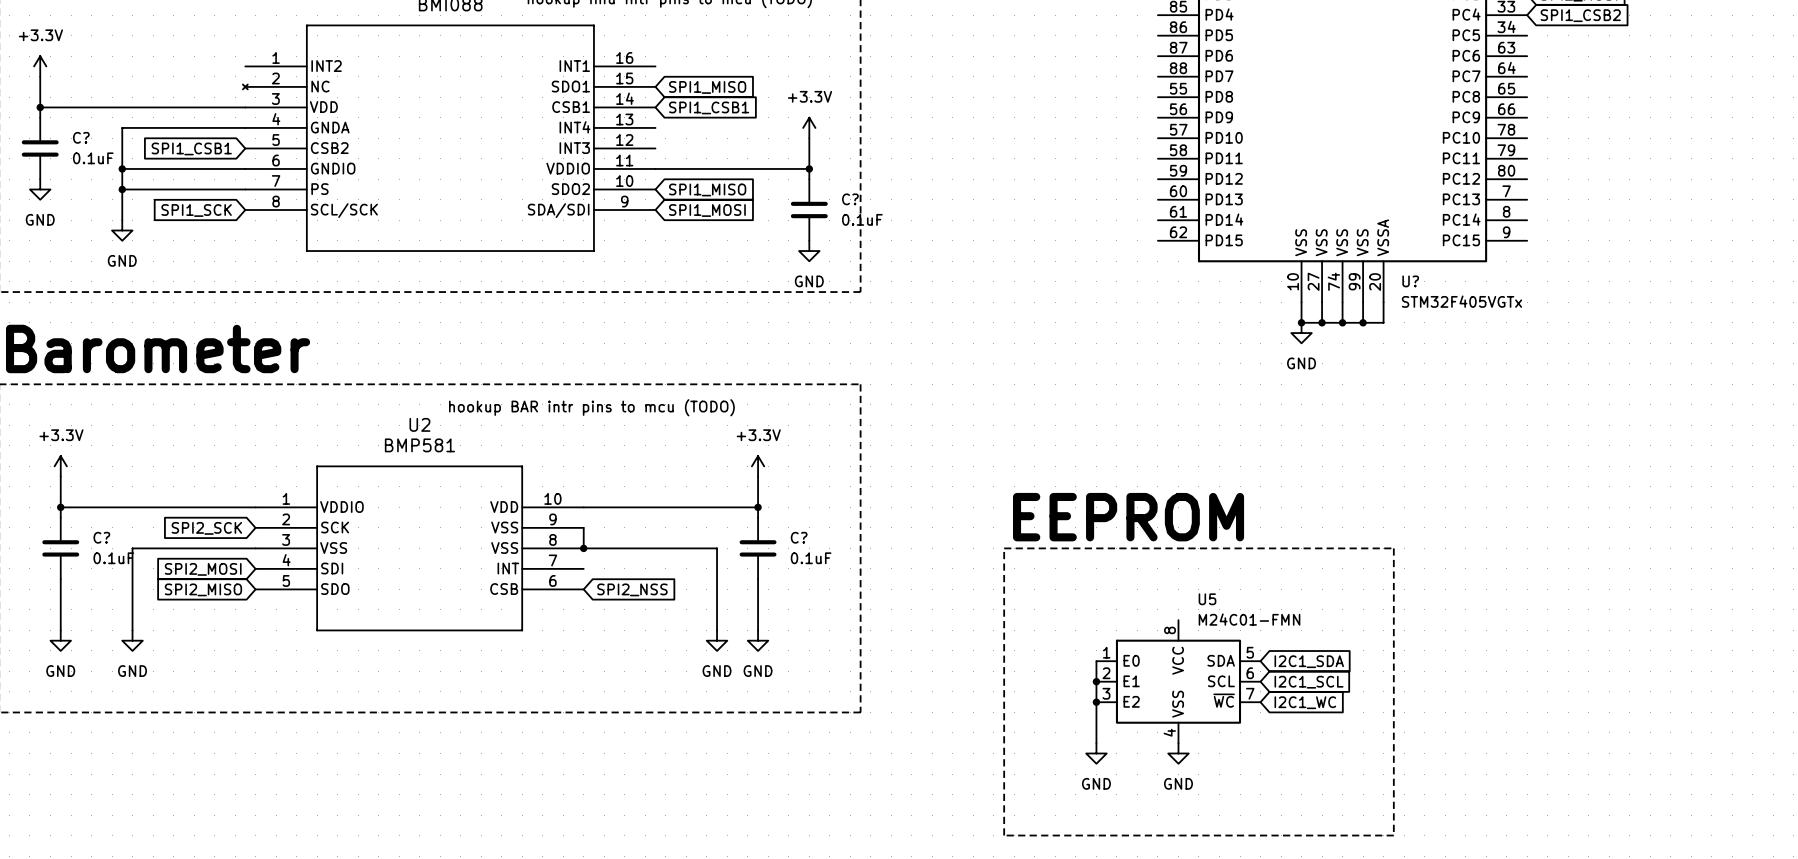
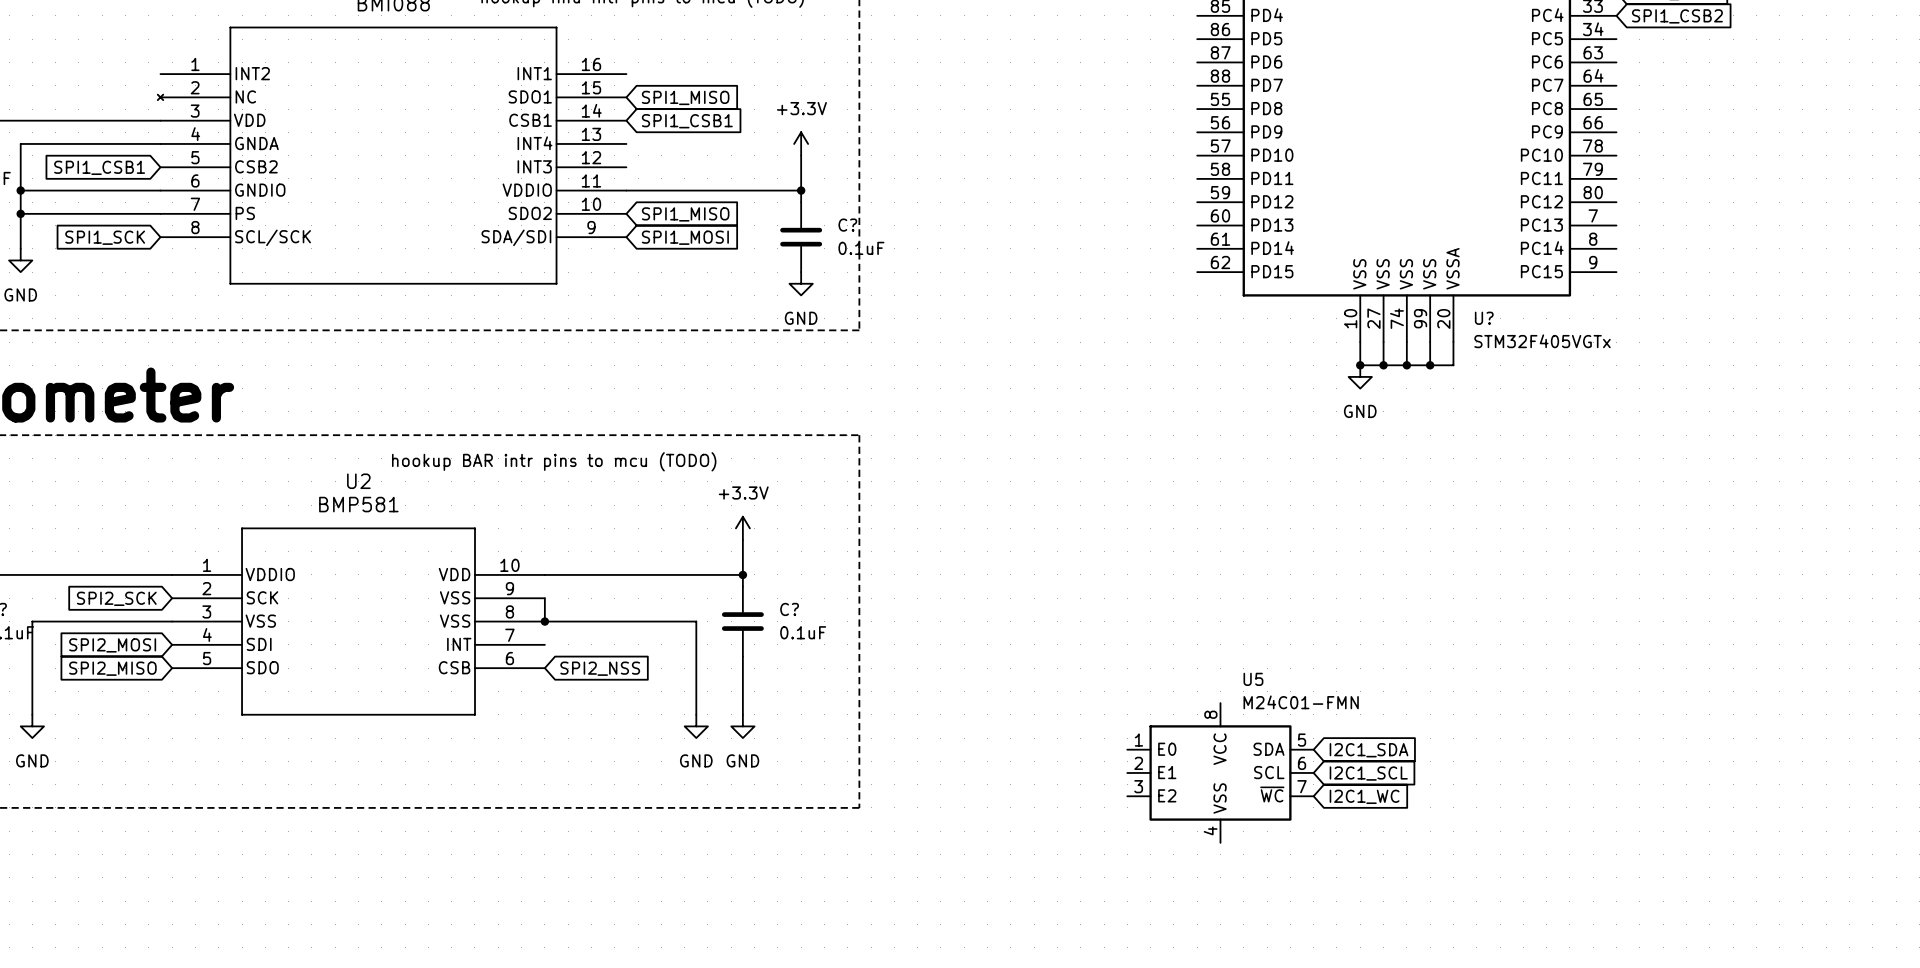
text: EEPROM (1128, 517) -> none
line: (1004, 548) (1393, 548) (1393, 835) (1004, 835) (1004, 548) -> none
wire: (1096, 661) (1096, 743) -> none
junction: (1096, 681) -> none
junction: (1096, 702) -> none
power symbol: GND (1096, 753) -> none
power symbol: GND (1178, 753) -> none

